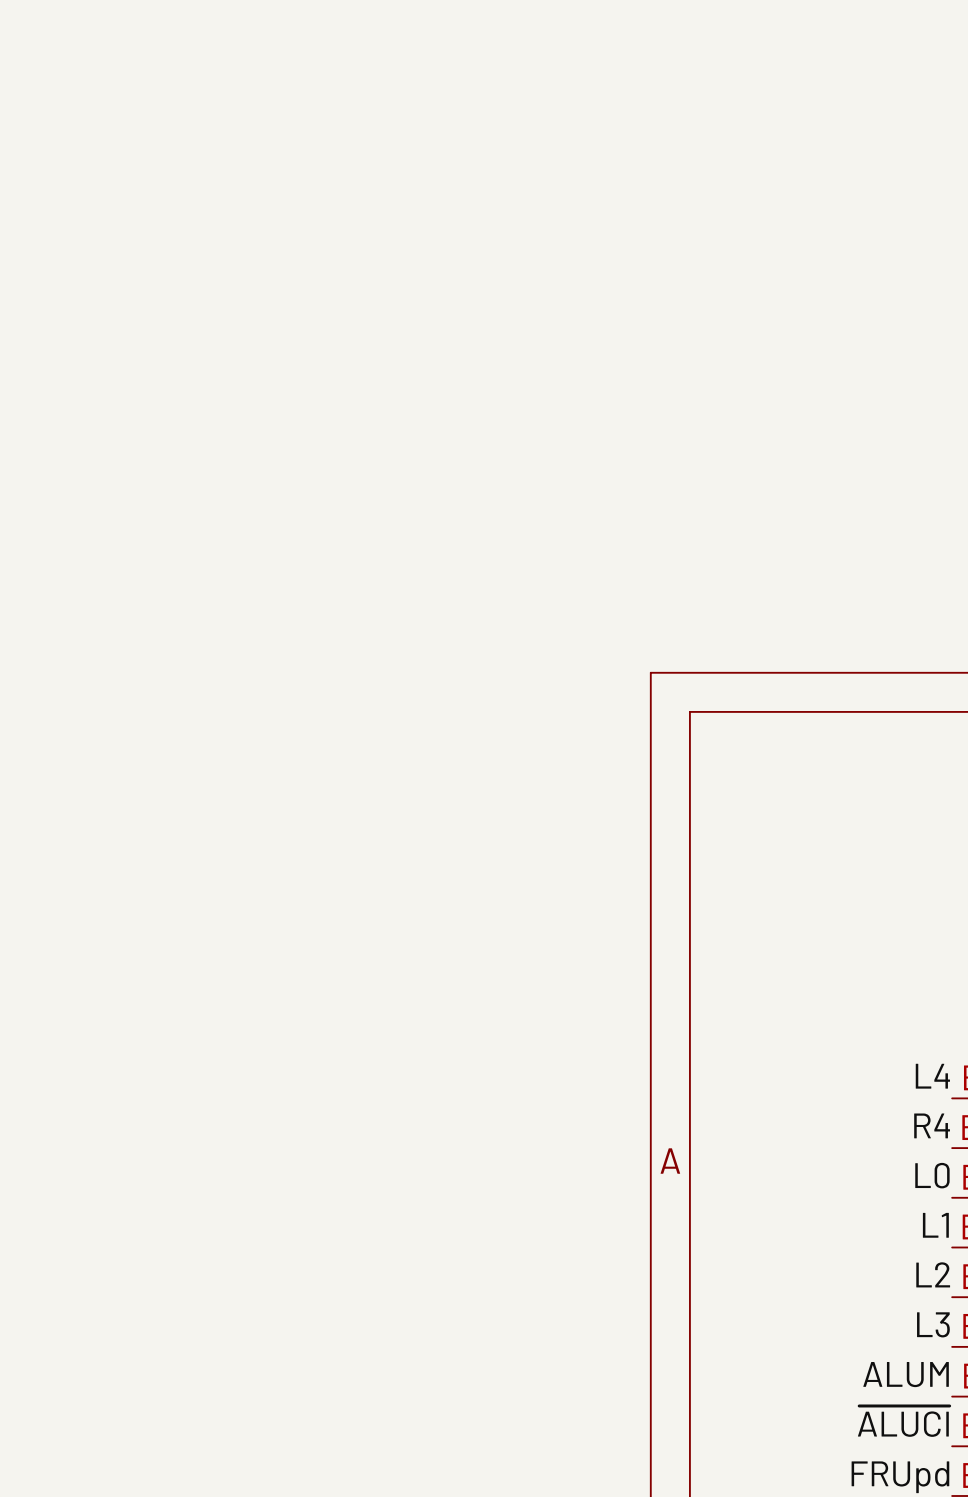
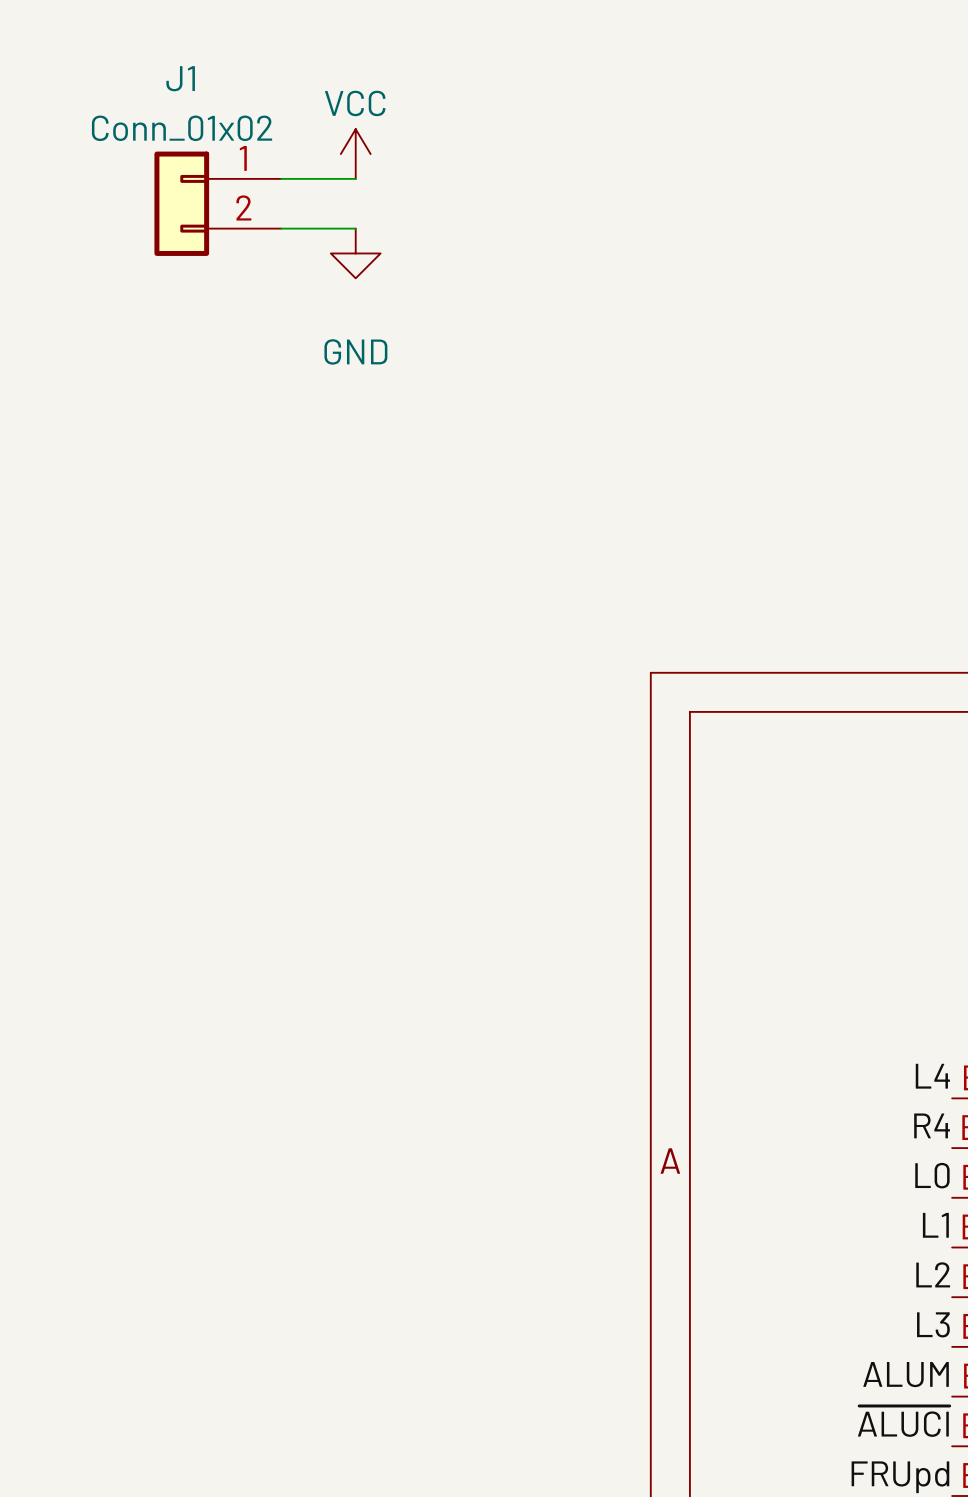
power symbol: none -> VCC (355, 154)
wire: none -> (281, 178) (355, 178)
J1: none -> Conn_01x02 (217, 203)
wire: none -> (281, 228) (355, 228)
power symbol: none -> GND (355, 253)

